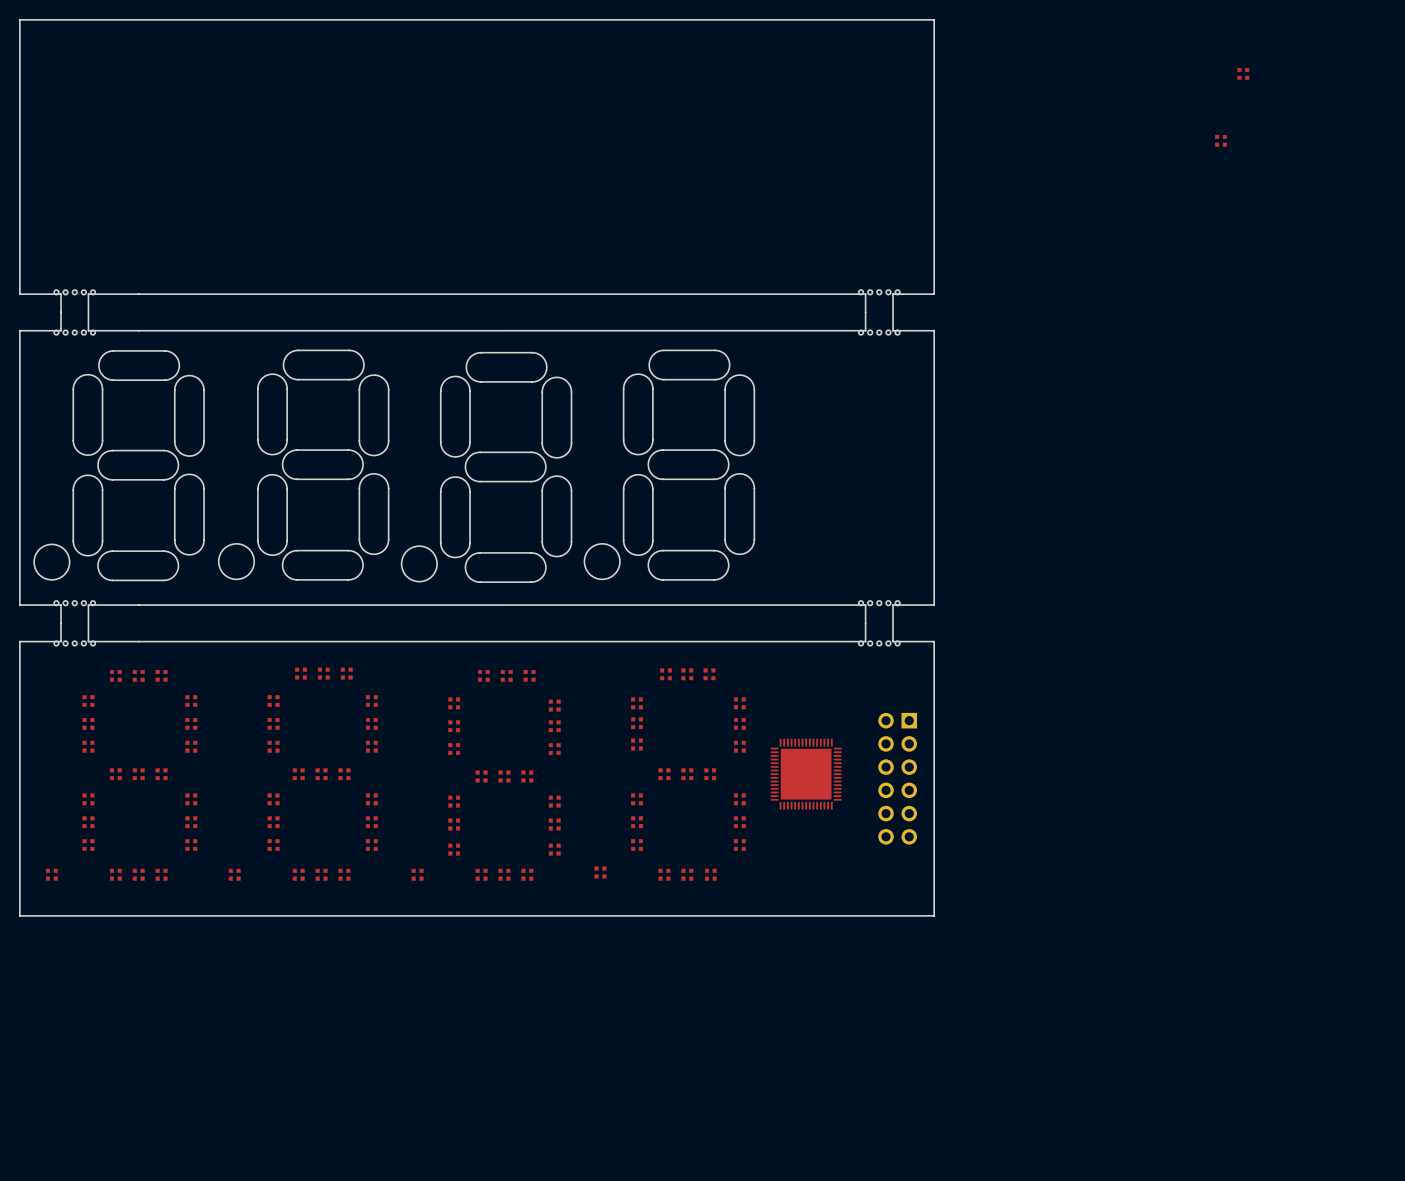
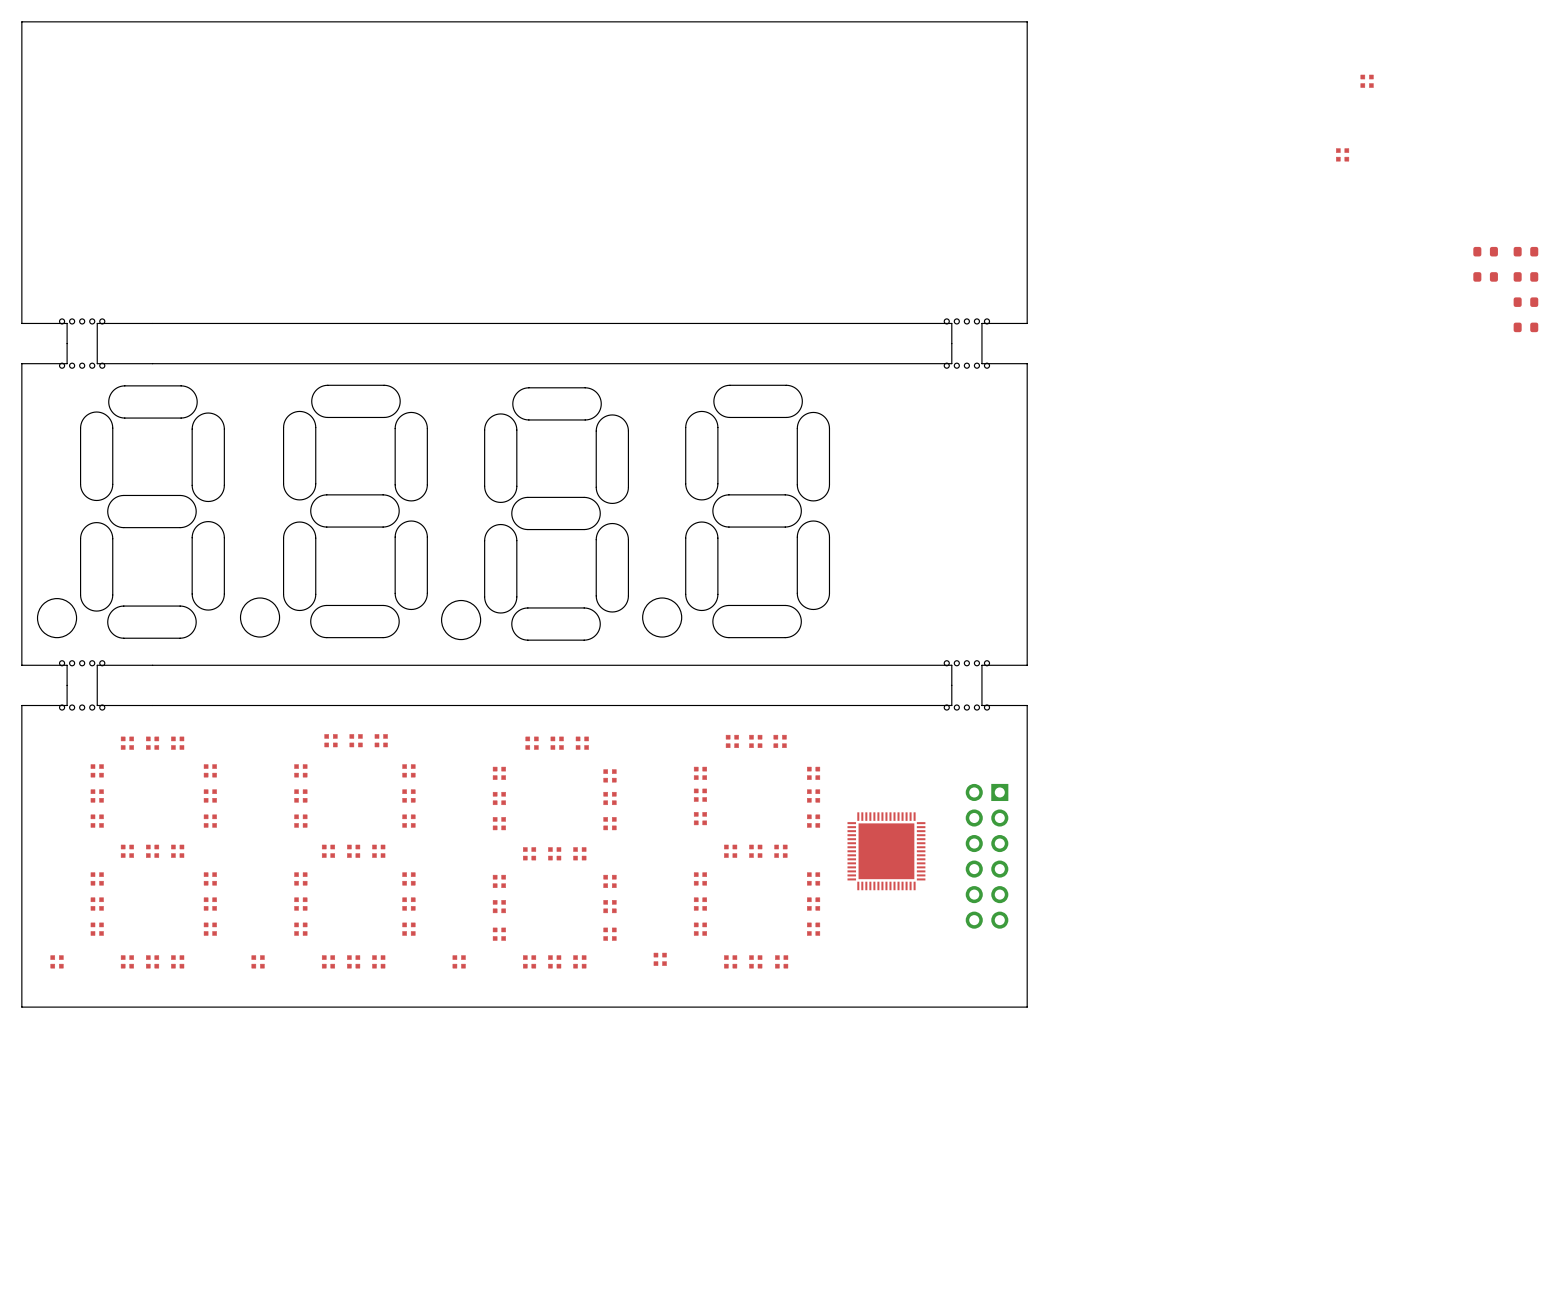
part: none -> (1485, 251)
part: none -> (1525, 251)
part: none -> (1485, 276)
part: none -> (1525, 276)
part: none -> (1525, 302)
part: none -> (1525, 327)

